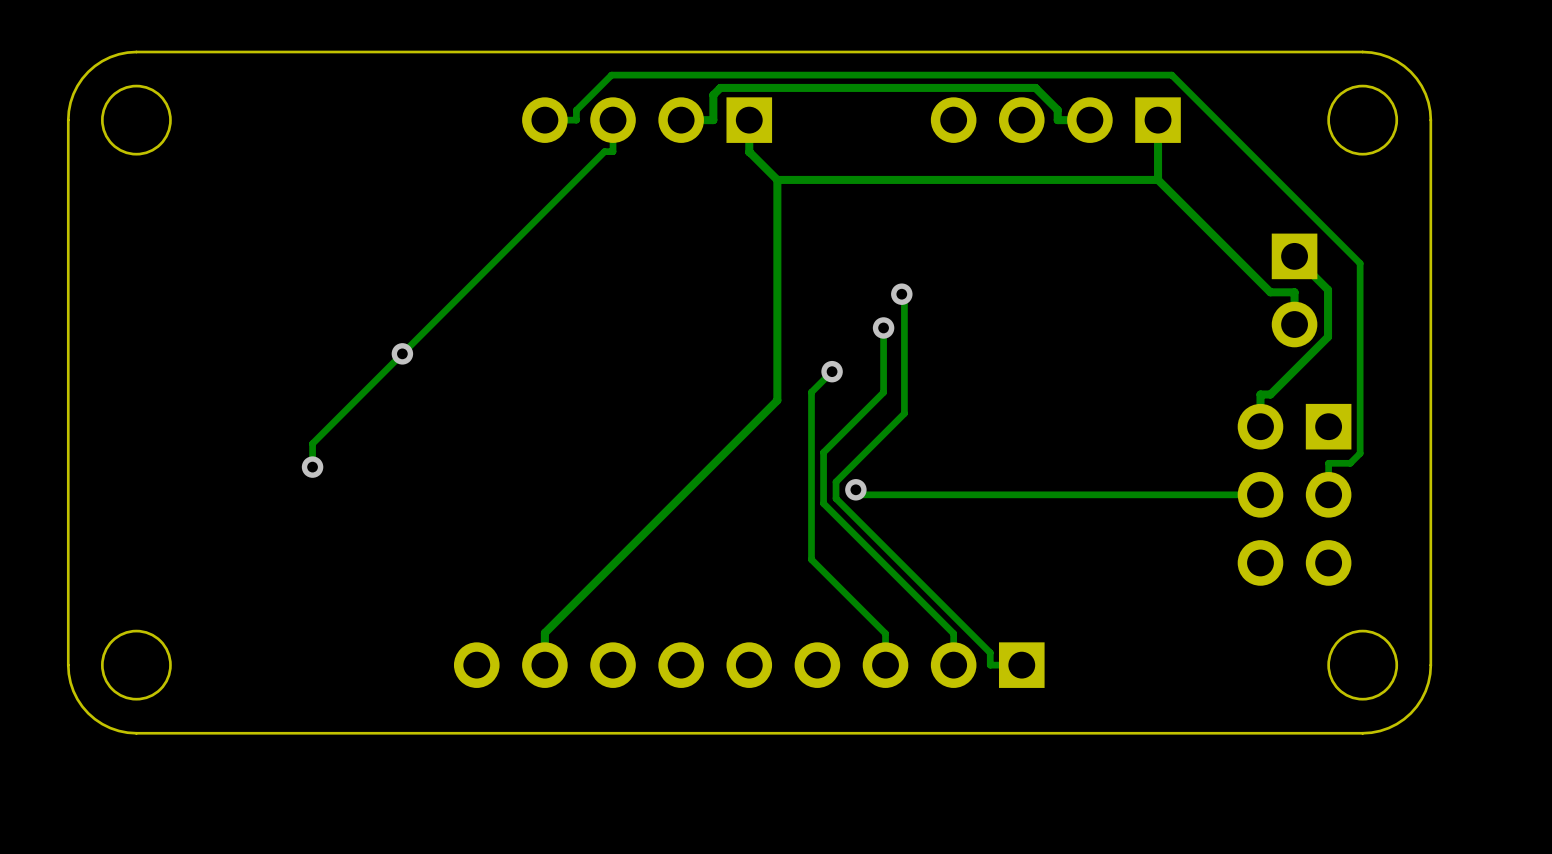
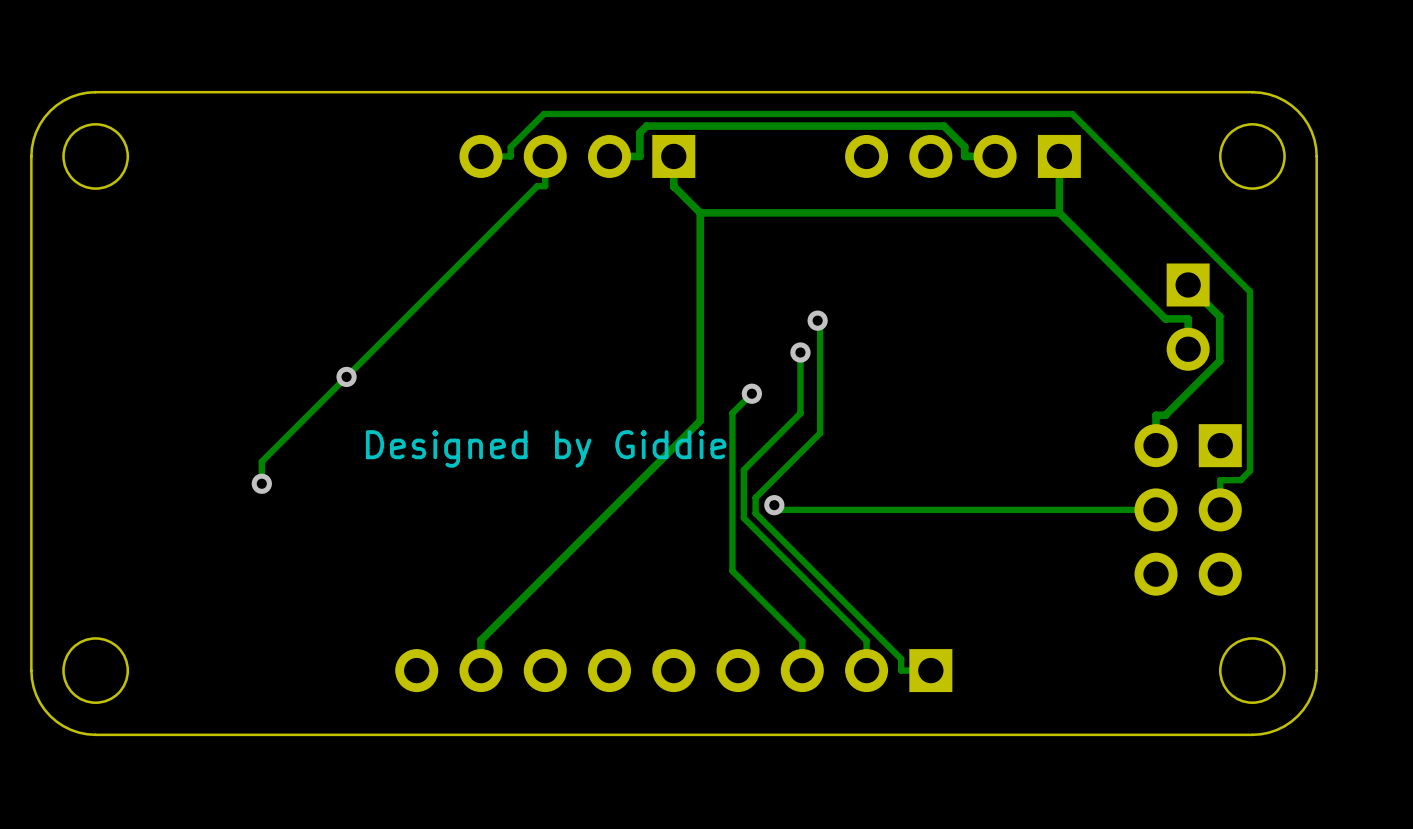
text: none -> Designed by Giddie (546, 448)

